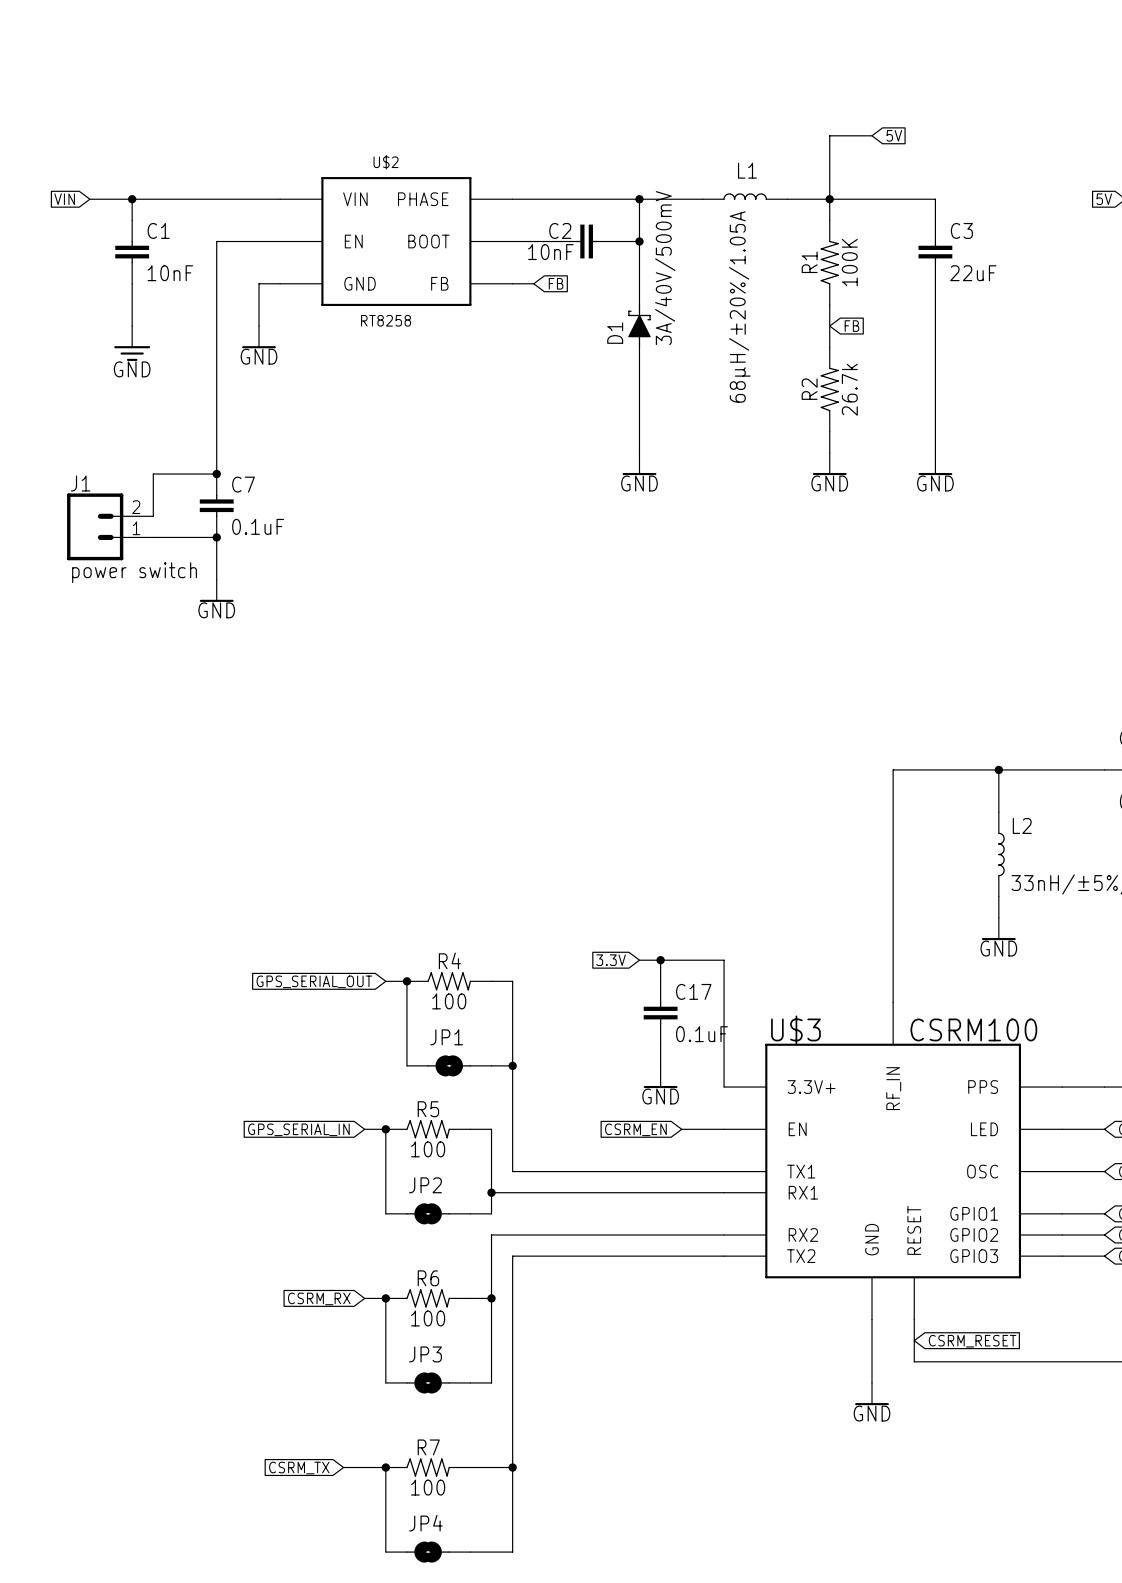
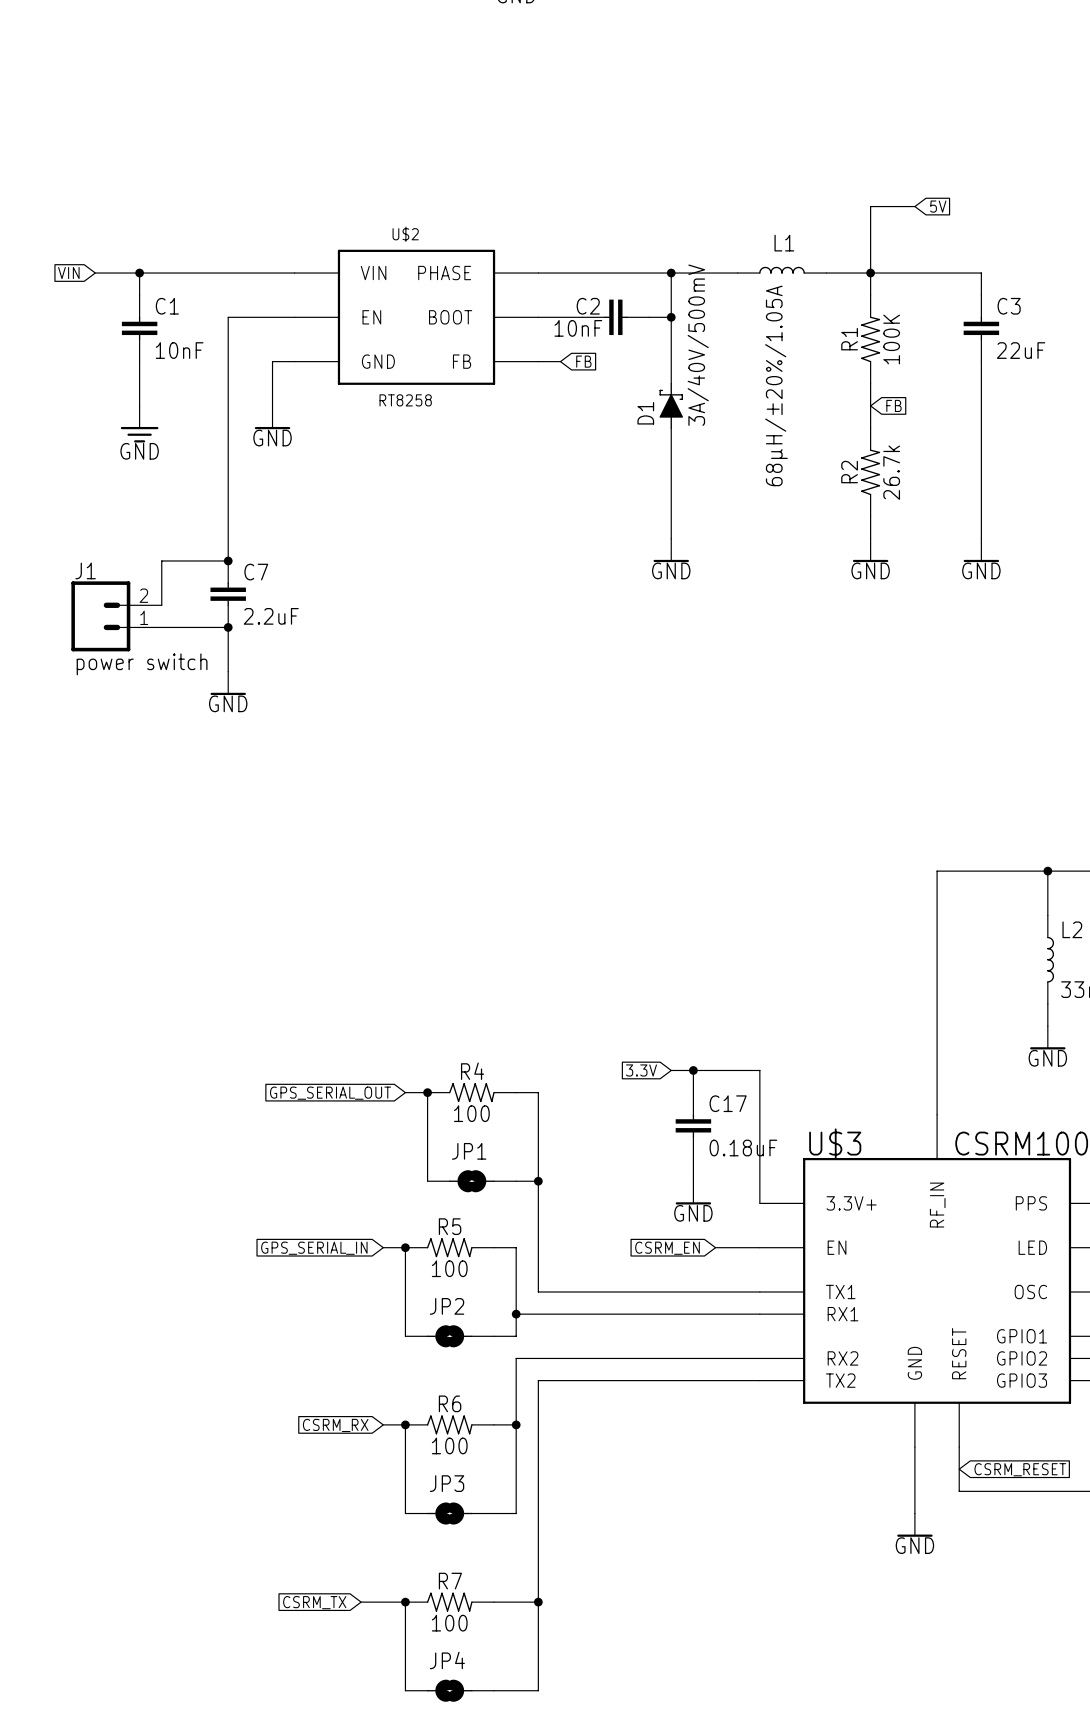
C7 value: 0.1uF (258, 526) -> 2.2uF (271, 616)
C17 value: 0.1uF (701, 1034) -> 0.18uF (743, 1148)

